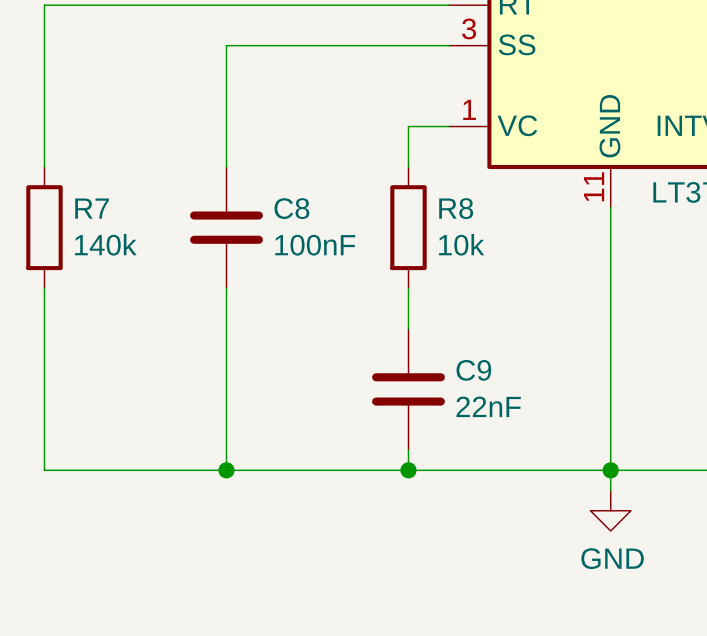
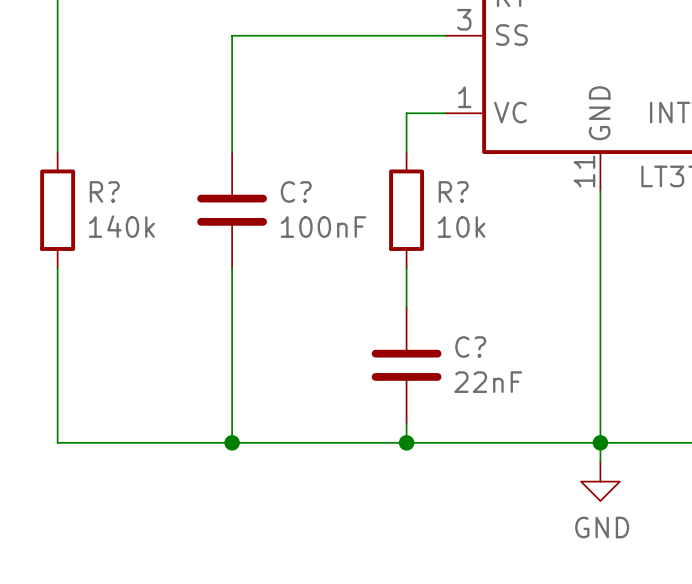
R7 name: R7 (92, 208) -> R? (104, 191)
C8 name: C8 (291, 208) -> C? (296, 191)
R8 name: R8 (456, 208) -> R? (453, 191)
C9 name: C9 (473, 370) -> C? (470, 347)

